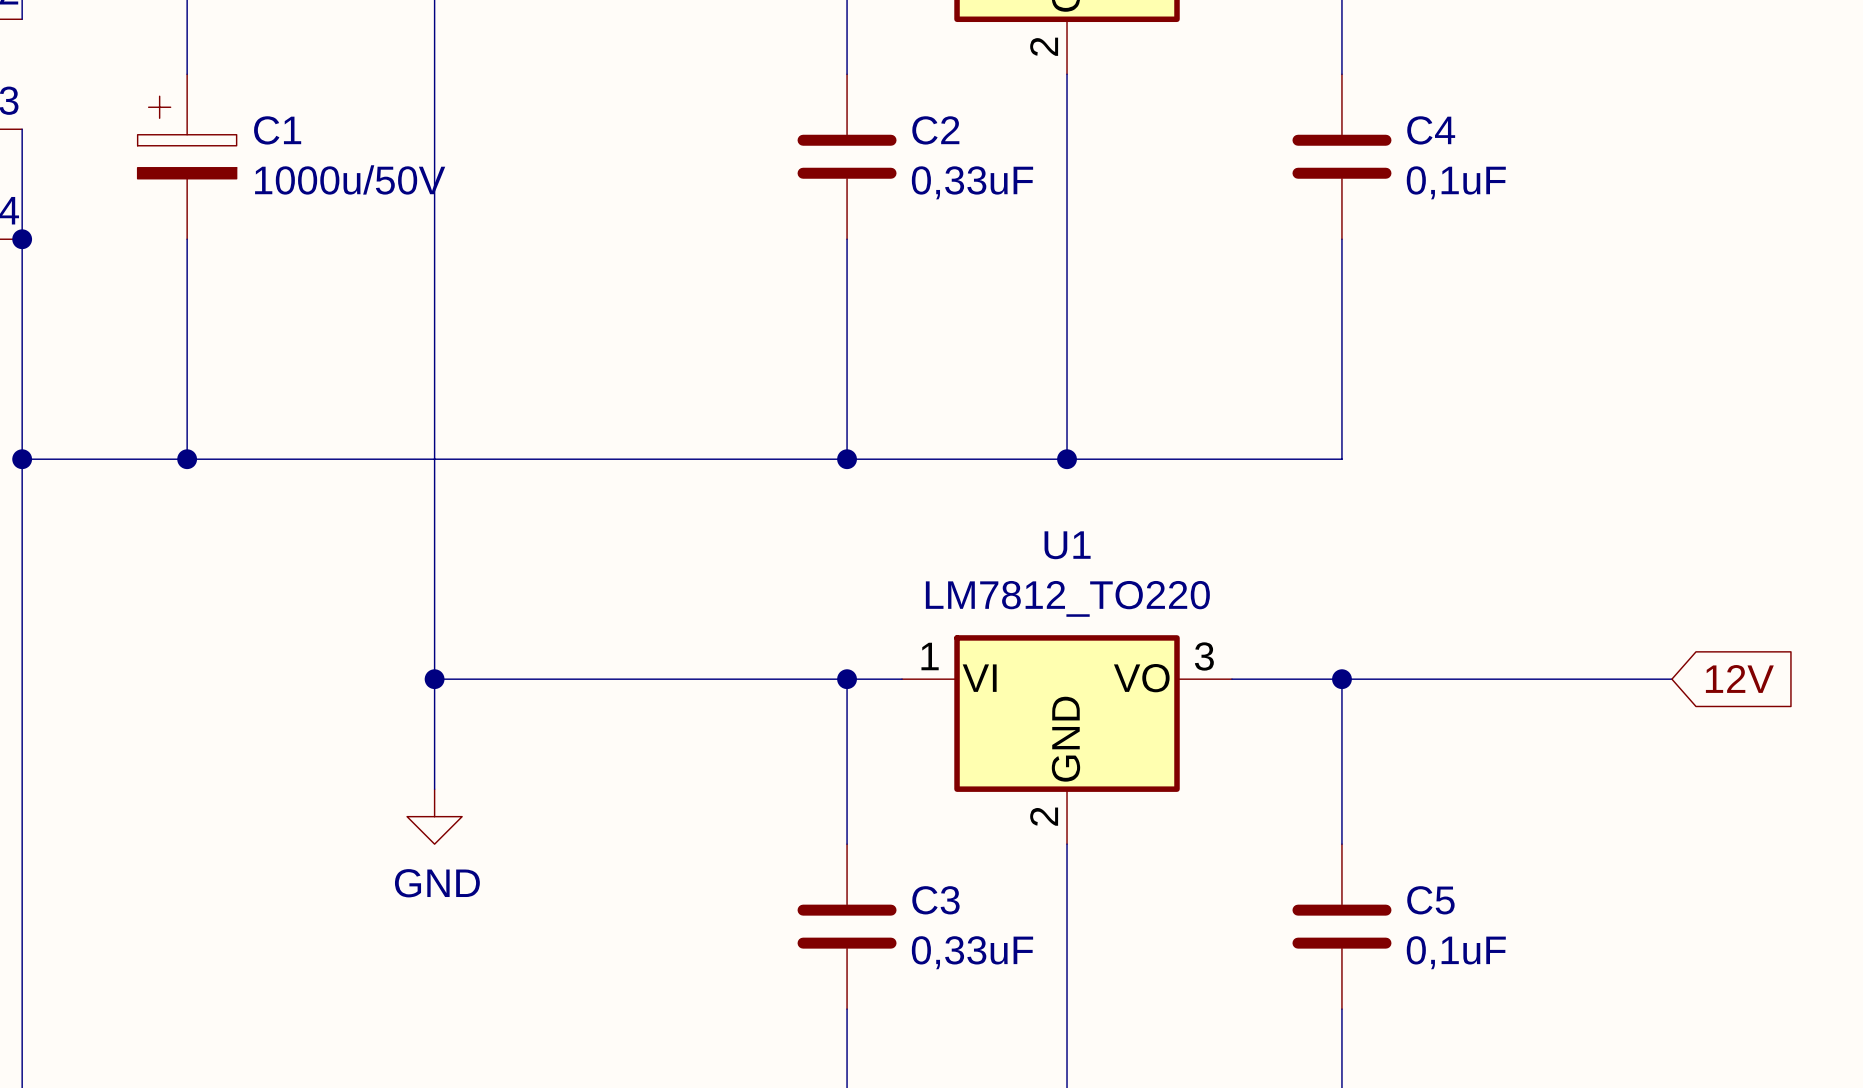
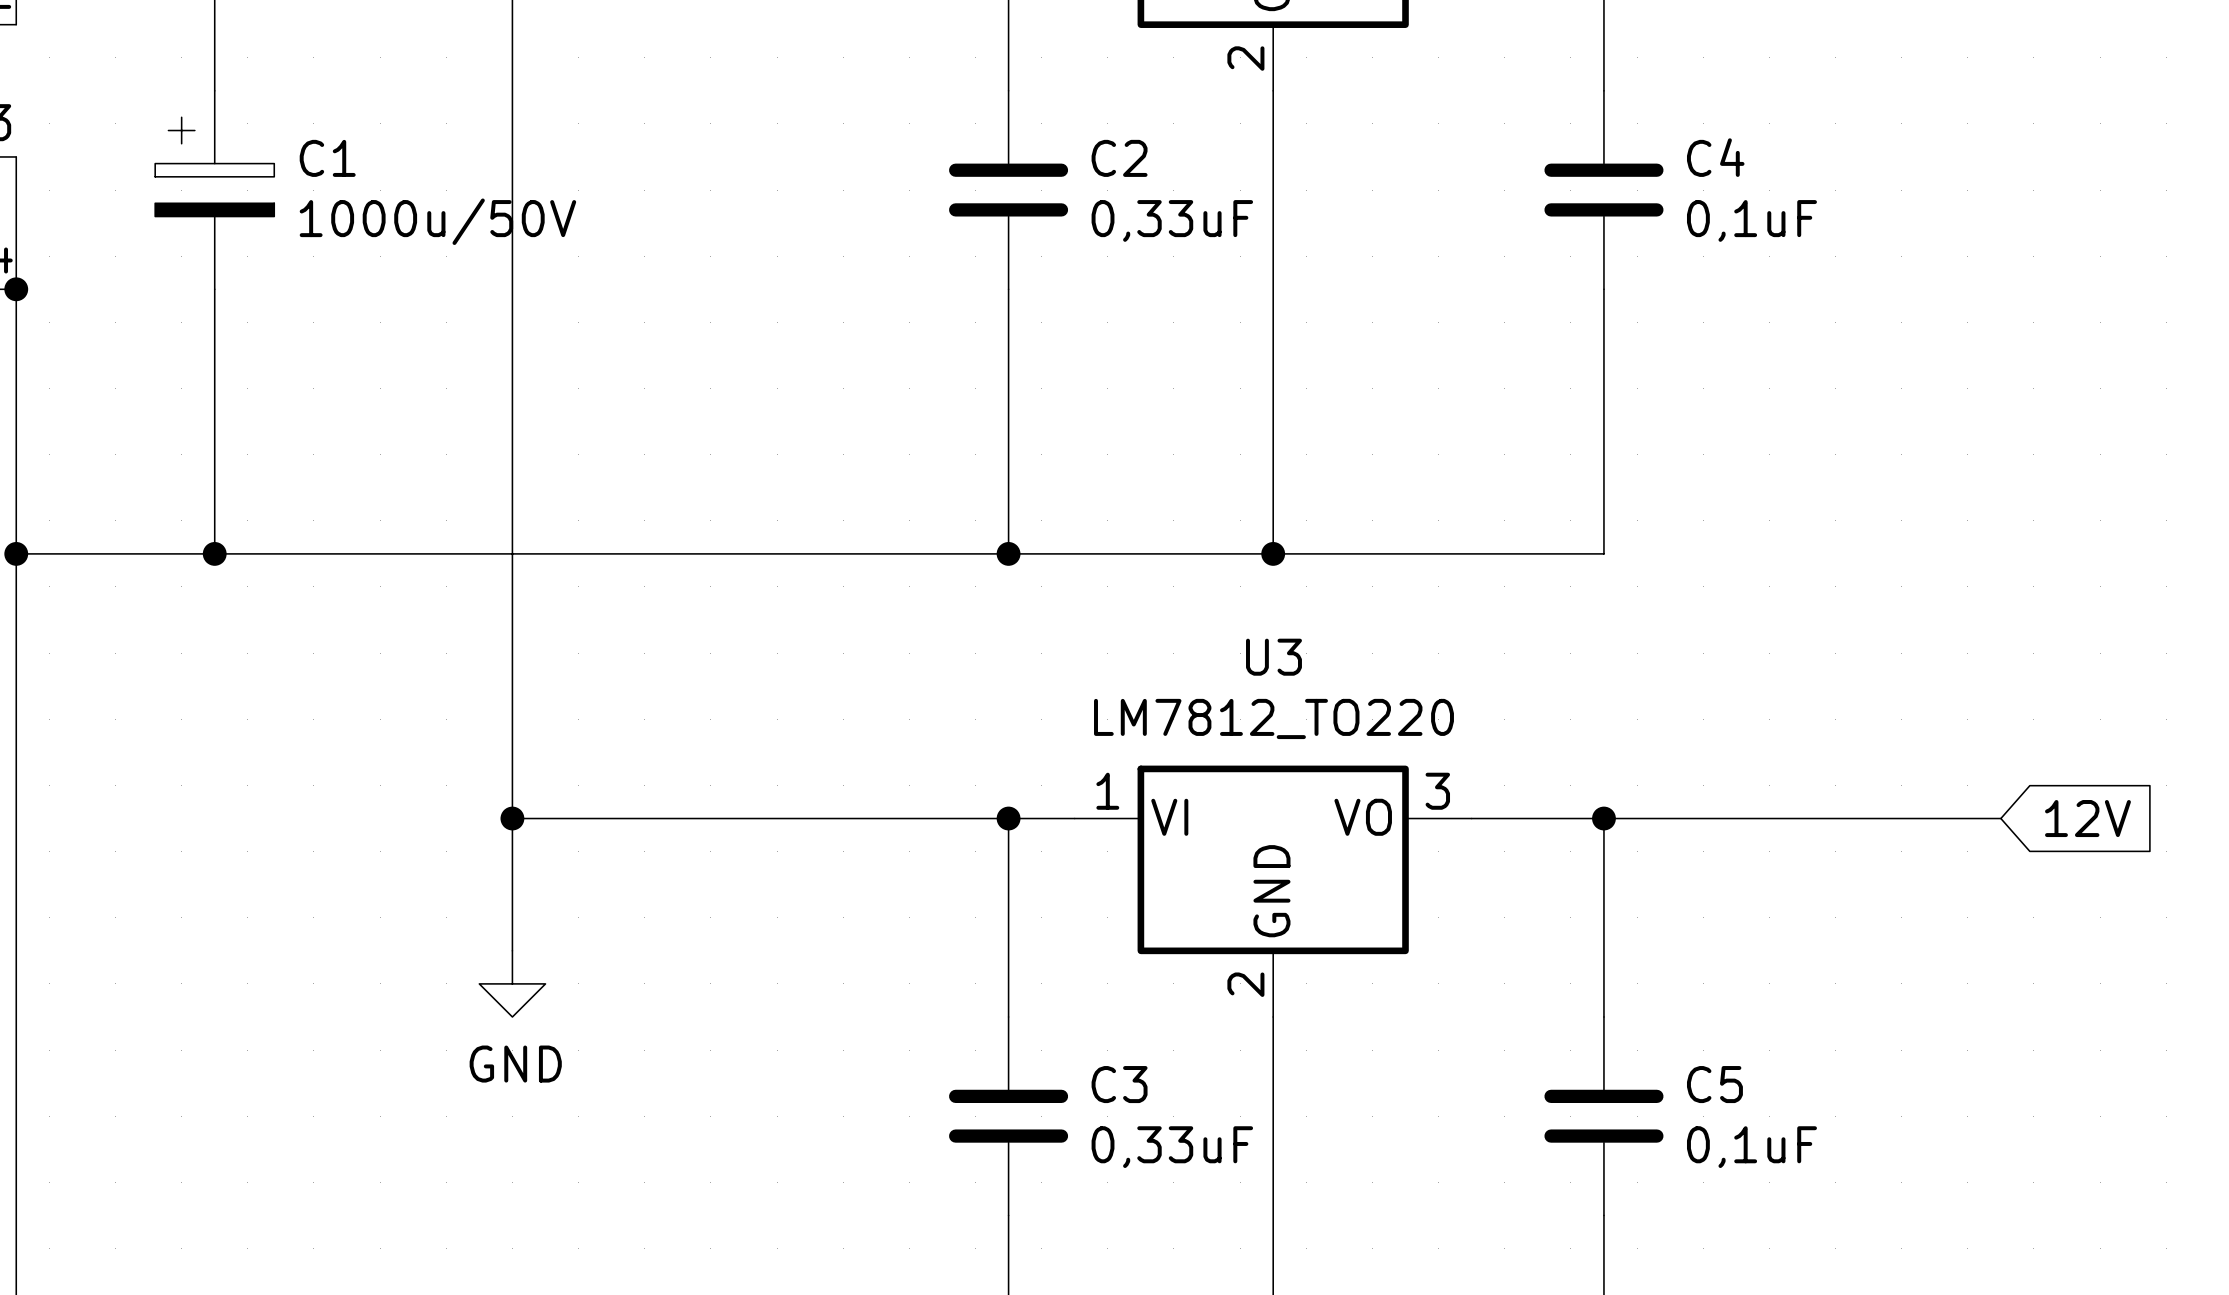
U1 name: U1 (1067, 545) -> U3 (1273, 657)

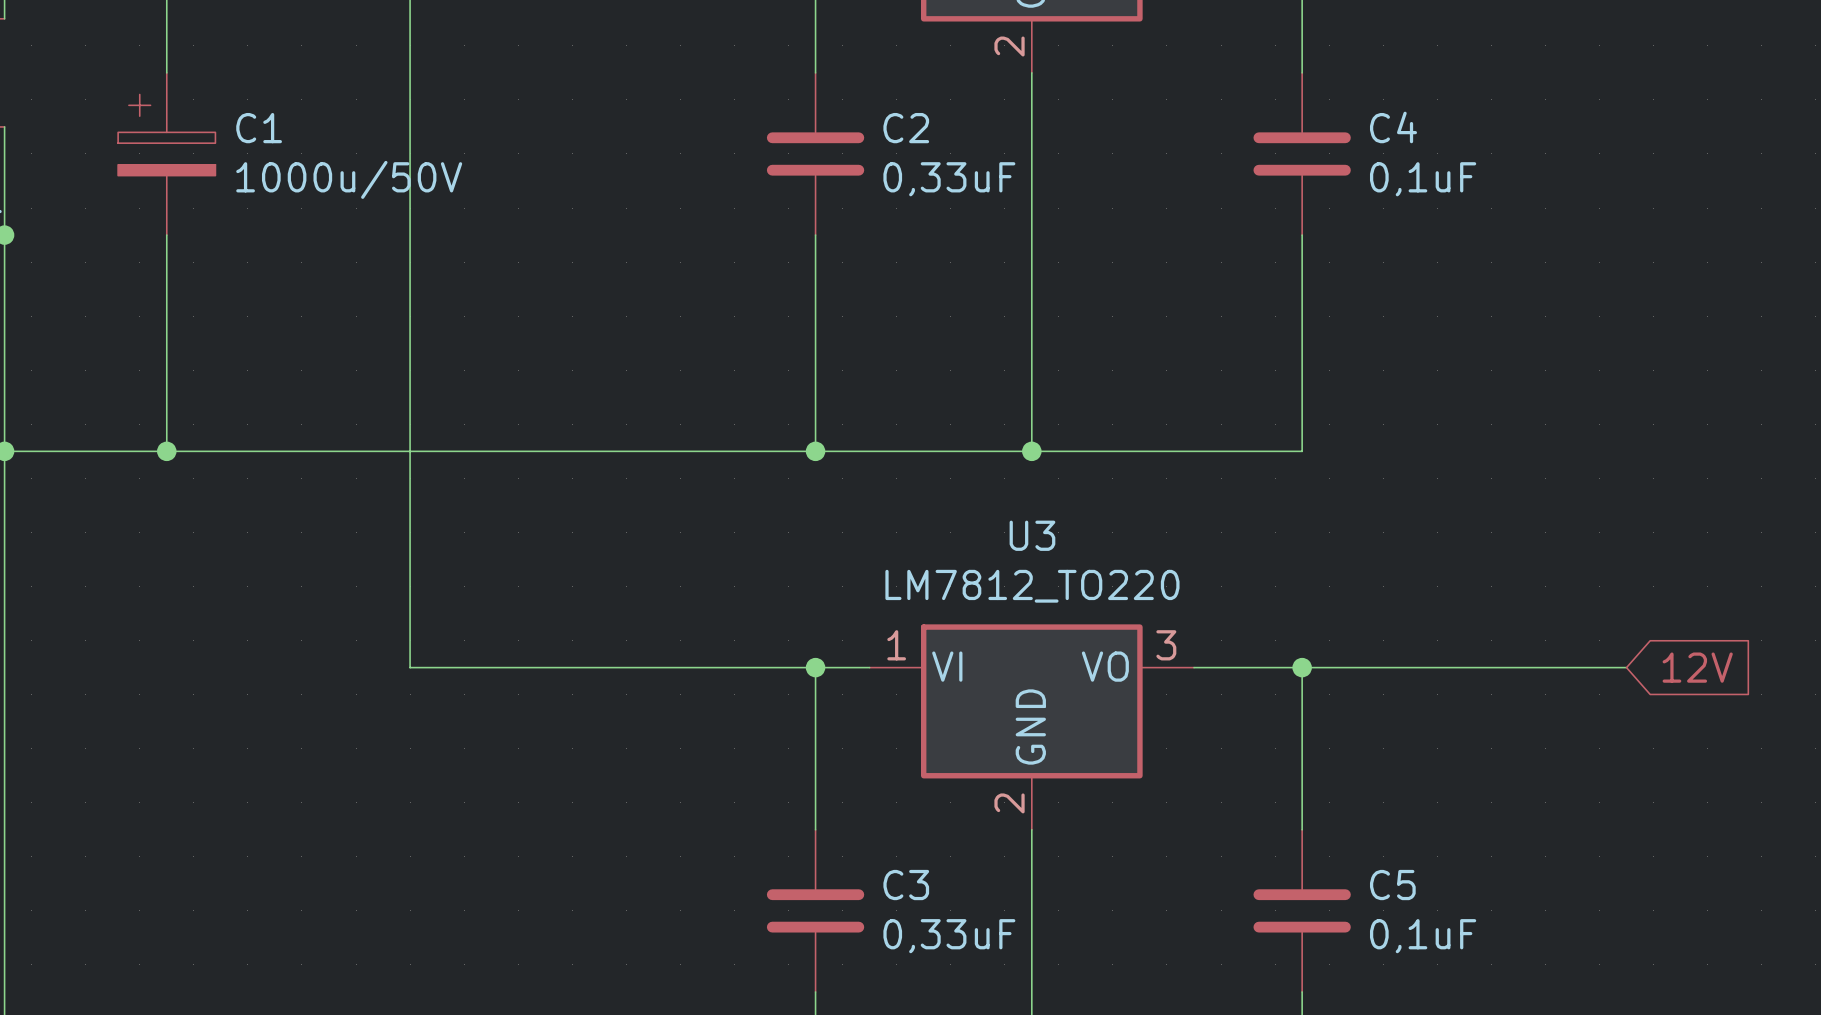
wire: (512, 818) (512, 950) -> none
junction: (512, 818) -> none
power symbol: GND (512, 983) -> none

